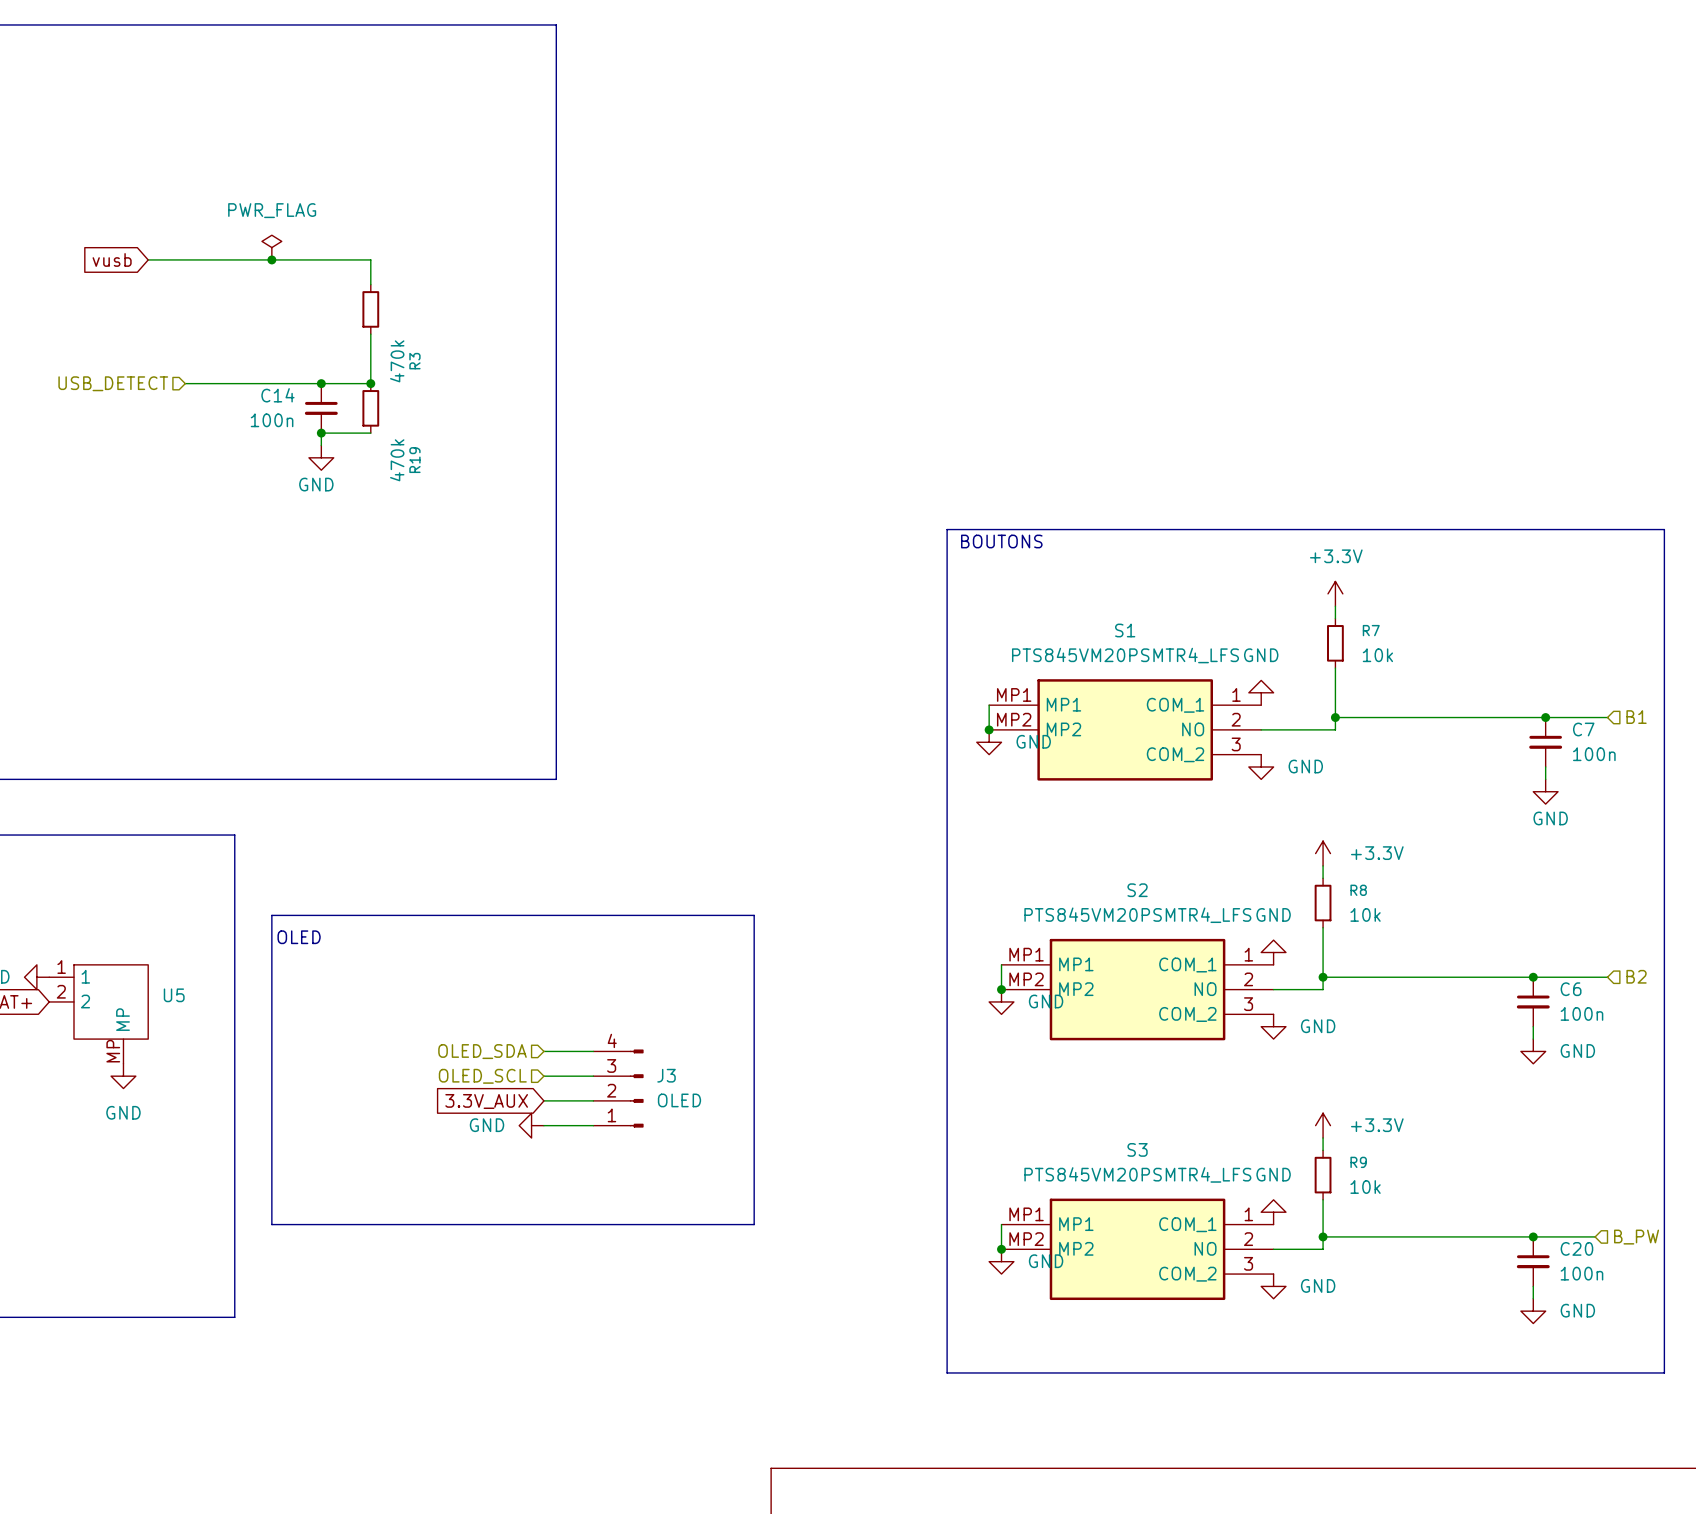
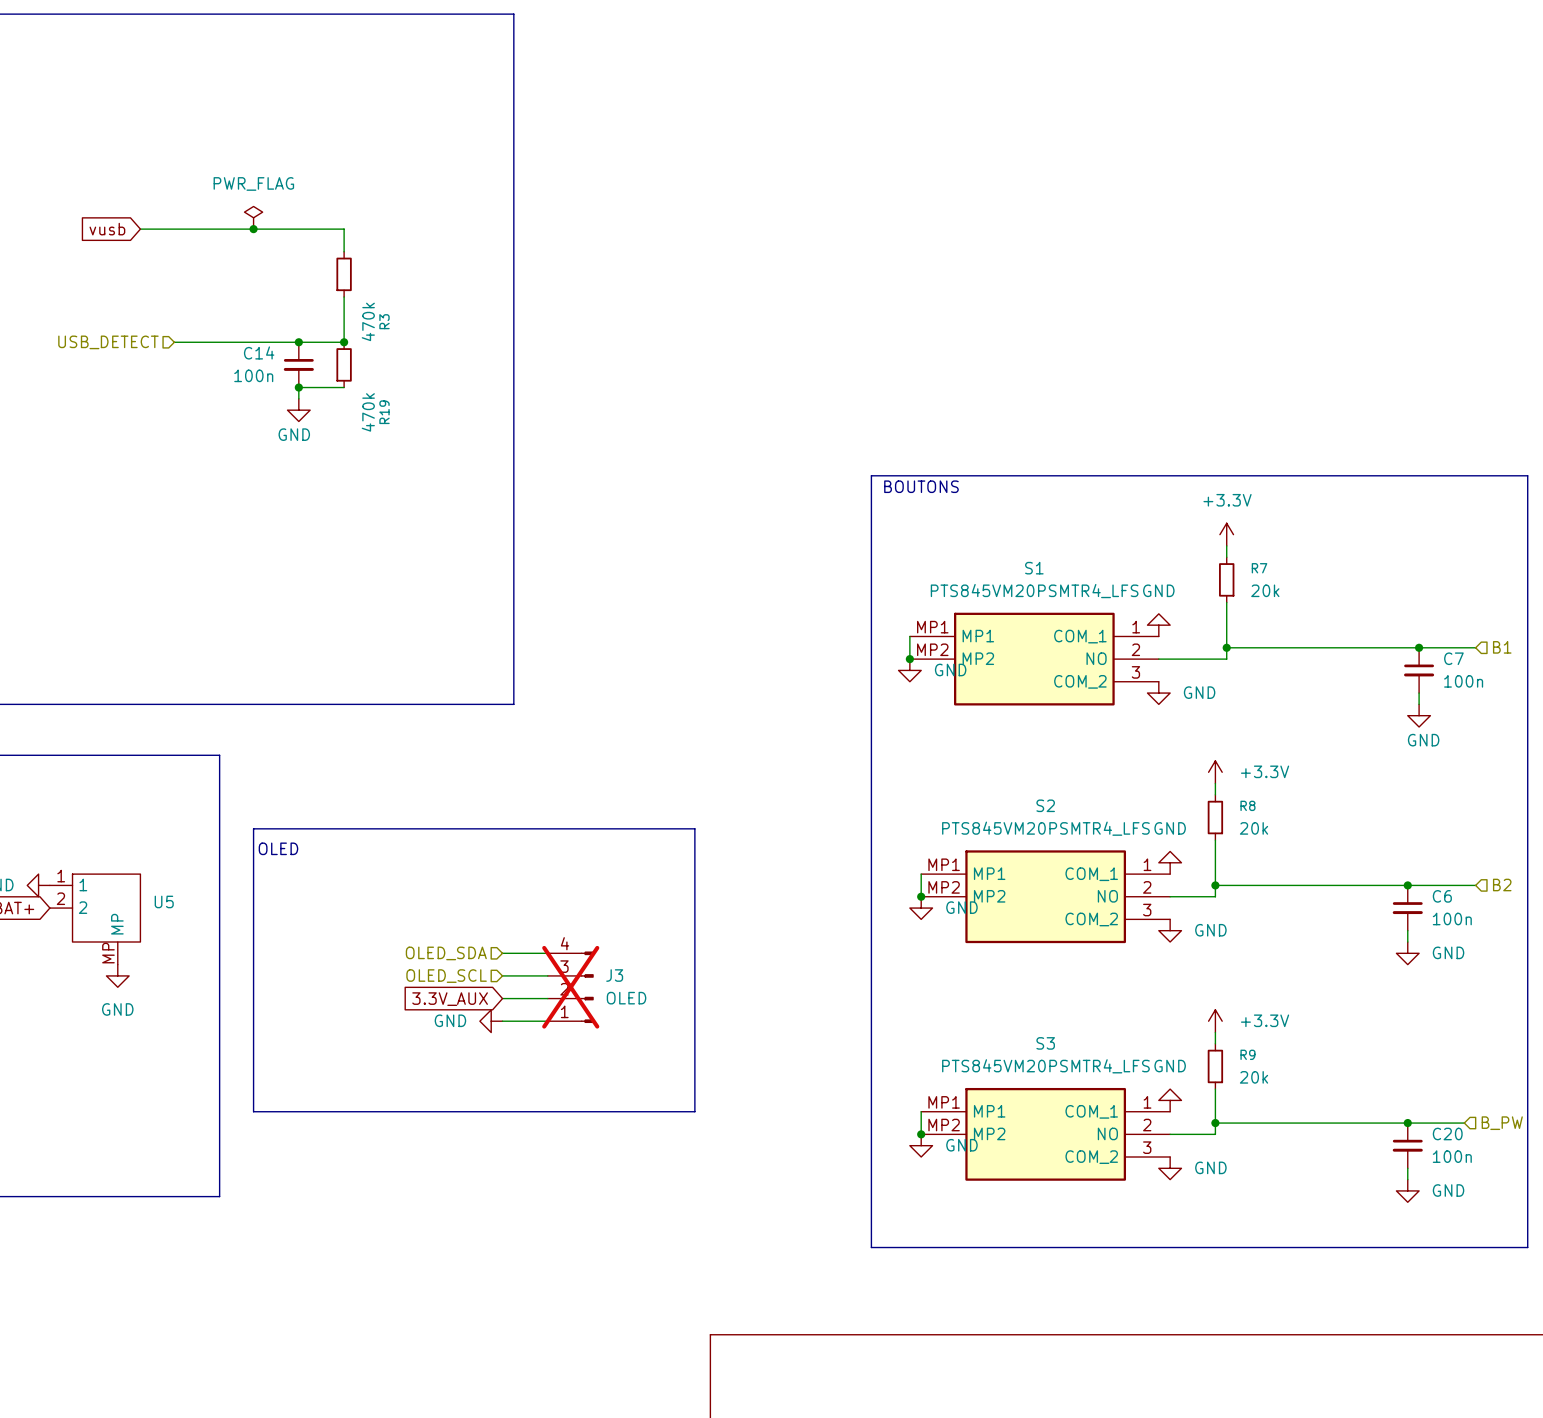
R7 value: 10k (1377, 655) -> 20k (1265, 590)
R8 value: 10k (1365, 914) -> 20k (1254, 828)
J3 do-not-place cross: none -> (570, 987)
R9 value: 10k (1365, 1187) -> 20k (1254, 1077)

